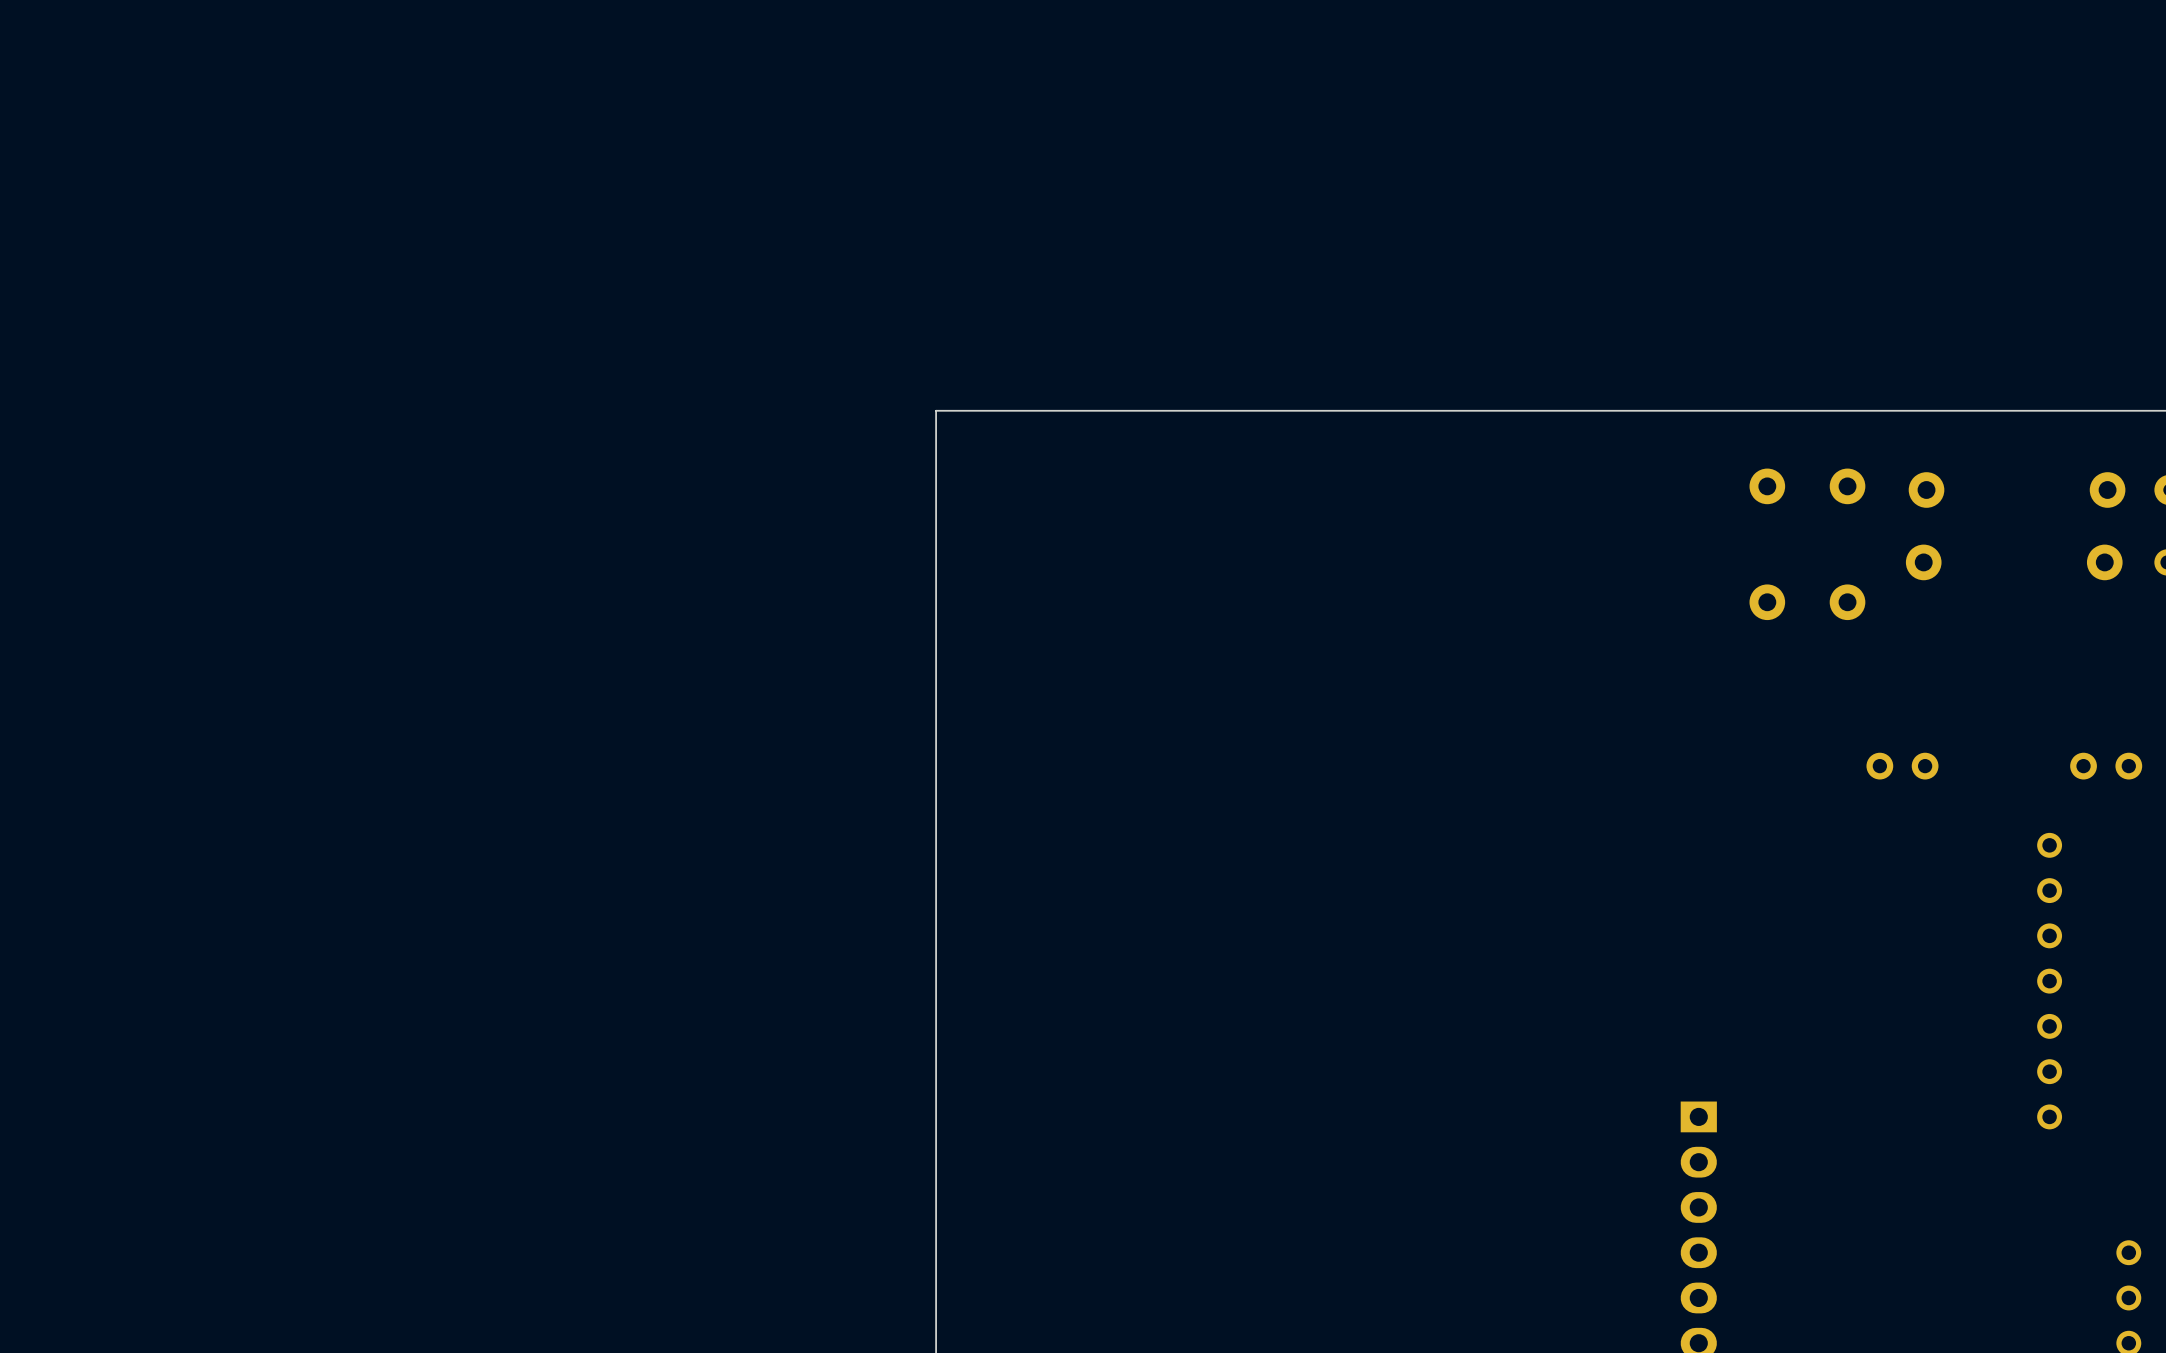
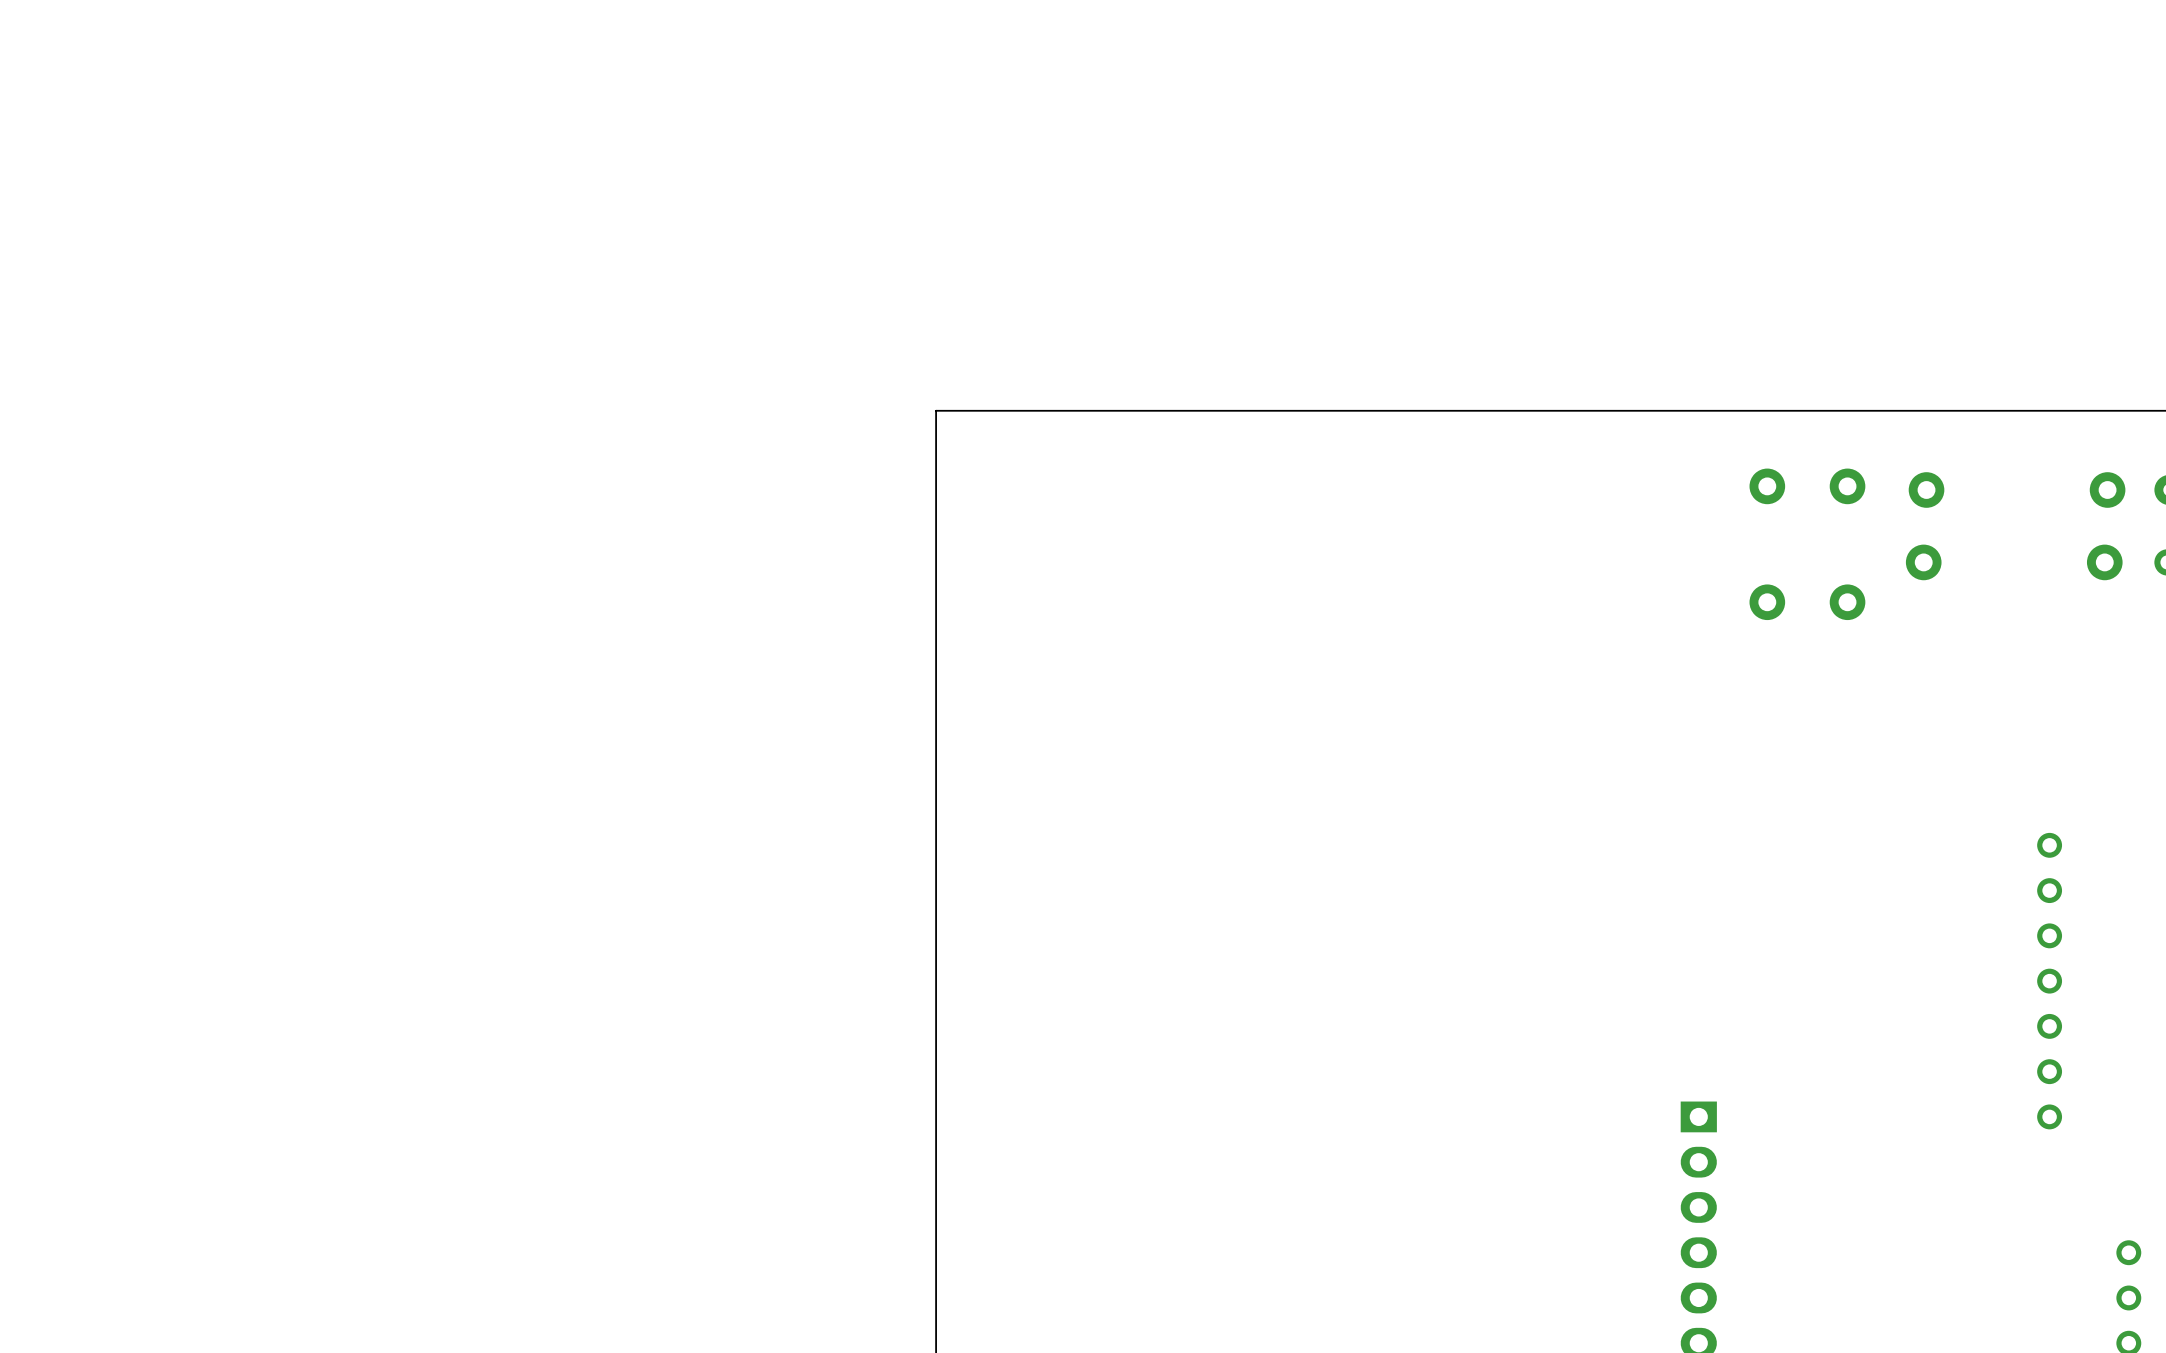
part: (1902, 766) -> none
part: (2106, 766) -> none

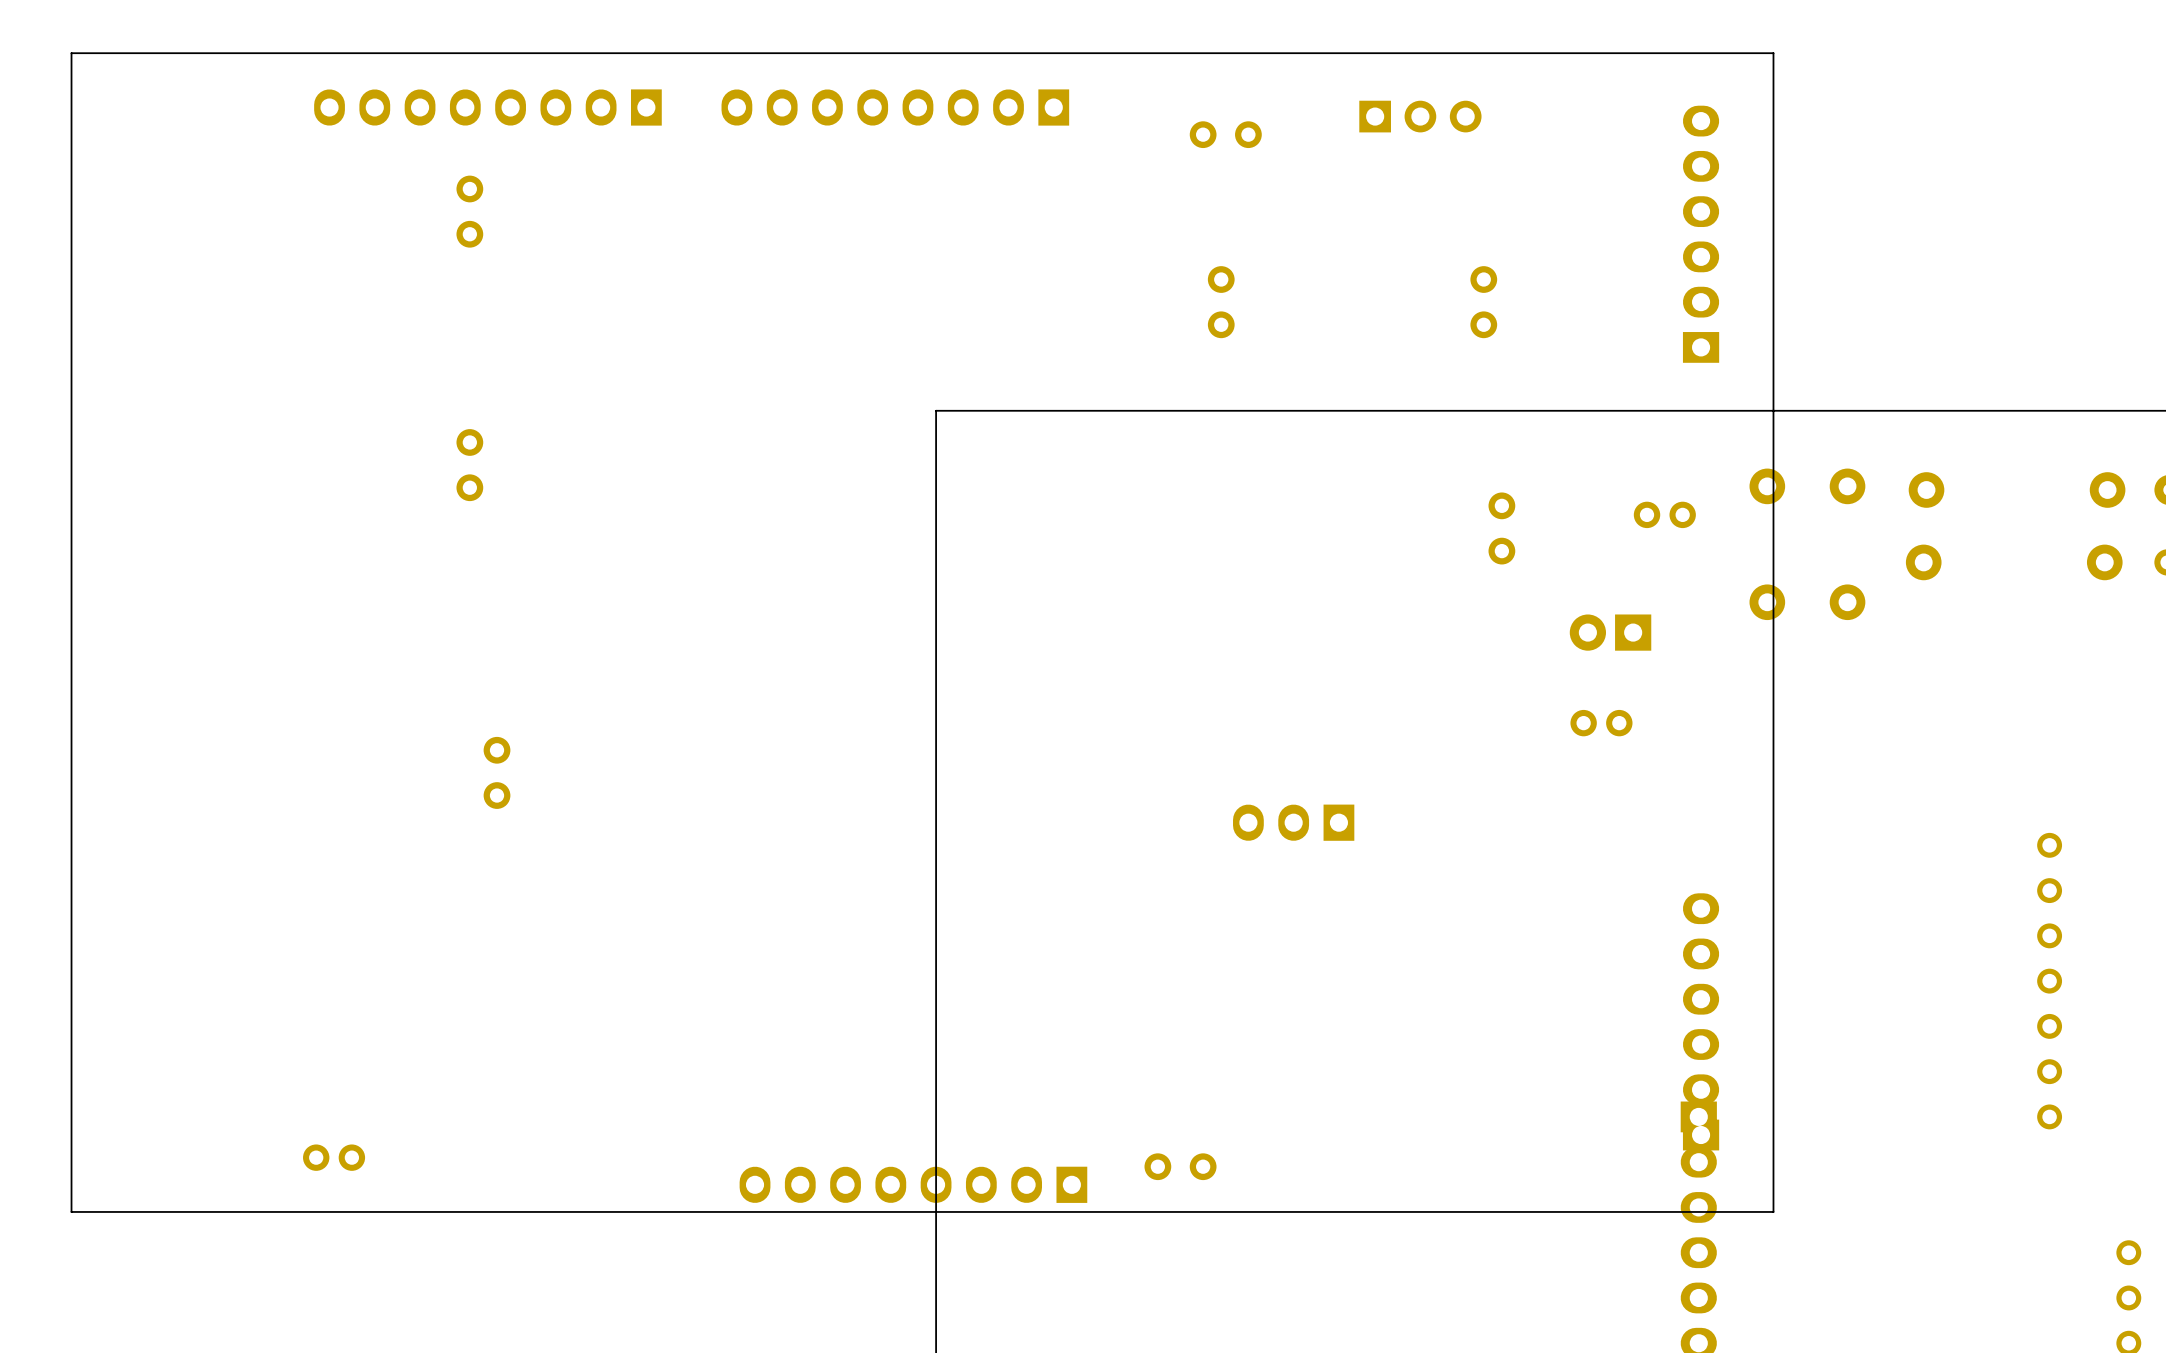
board edge: none -> (1773, 53) (71, 53) (71, 1211) (1773, 1211) (1773, 53)
part: none -> (487, 107)
part: none -> (895, 107)
part: none -> (1420, 116)
part: none -> (1225, 134)
part: none -> (469, 211)
part: none -> (1701, 234)
part: none -> (1221, 302)
part: none -> (1483, 302)
part: none -> (469, 465)
part: none -> (1664, 514)
part: none -> (1501, 528)
part: none -> (1610, 632)
part: none -> (1601, 723)
part: none -> (497, 772)
part: none -> (1293, 822)
part: none -> (1701, 1021)
part: none -> (334, 1157)
part: none -> (1180, 1166)
part: none -> (913, 1184)

